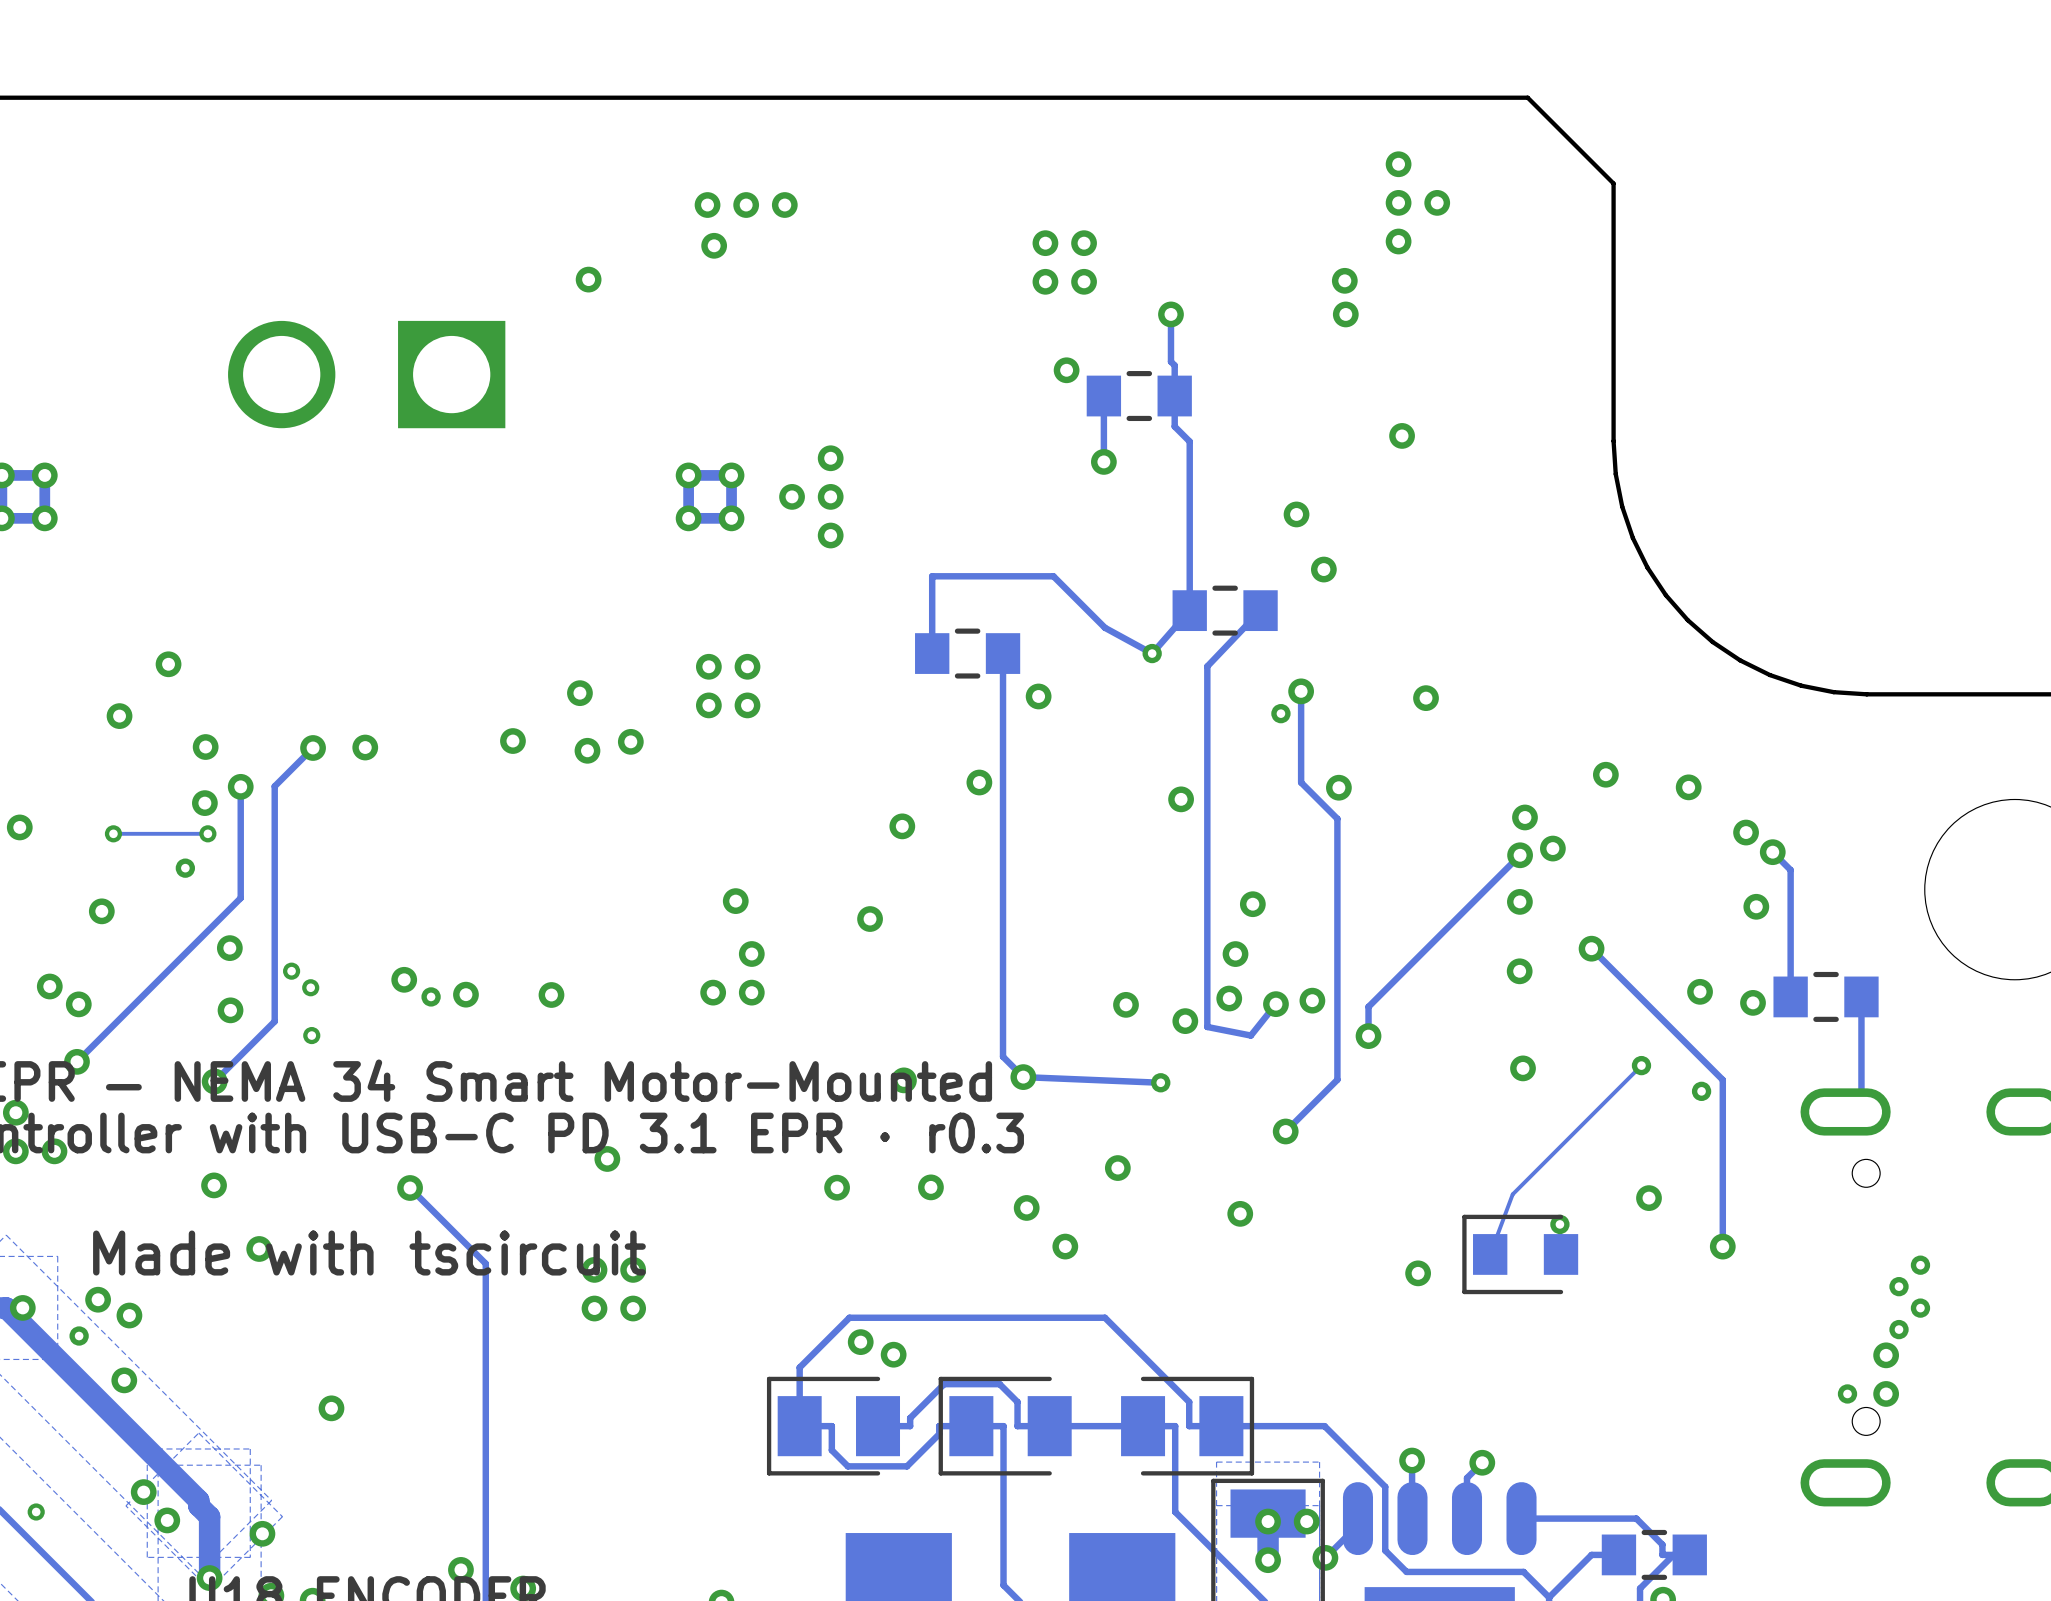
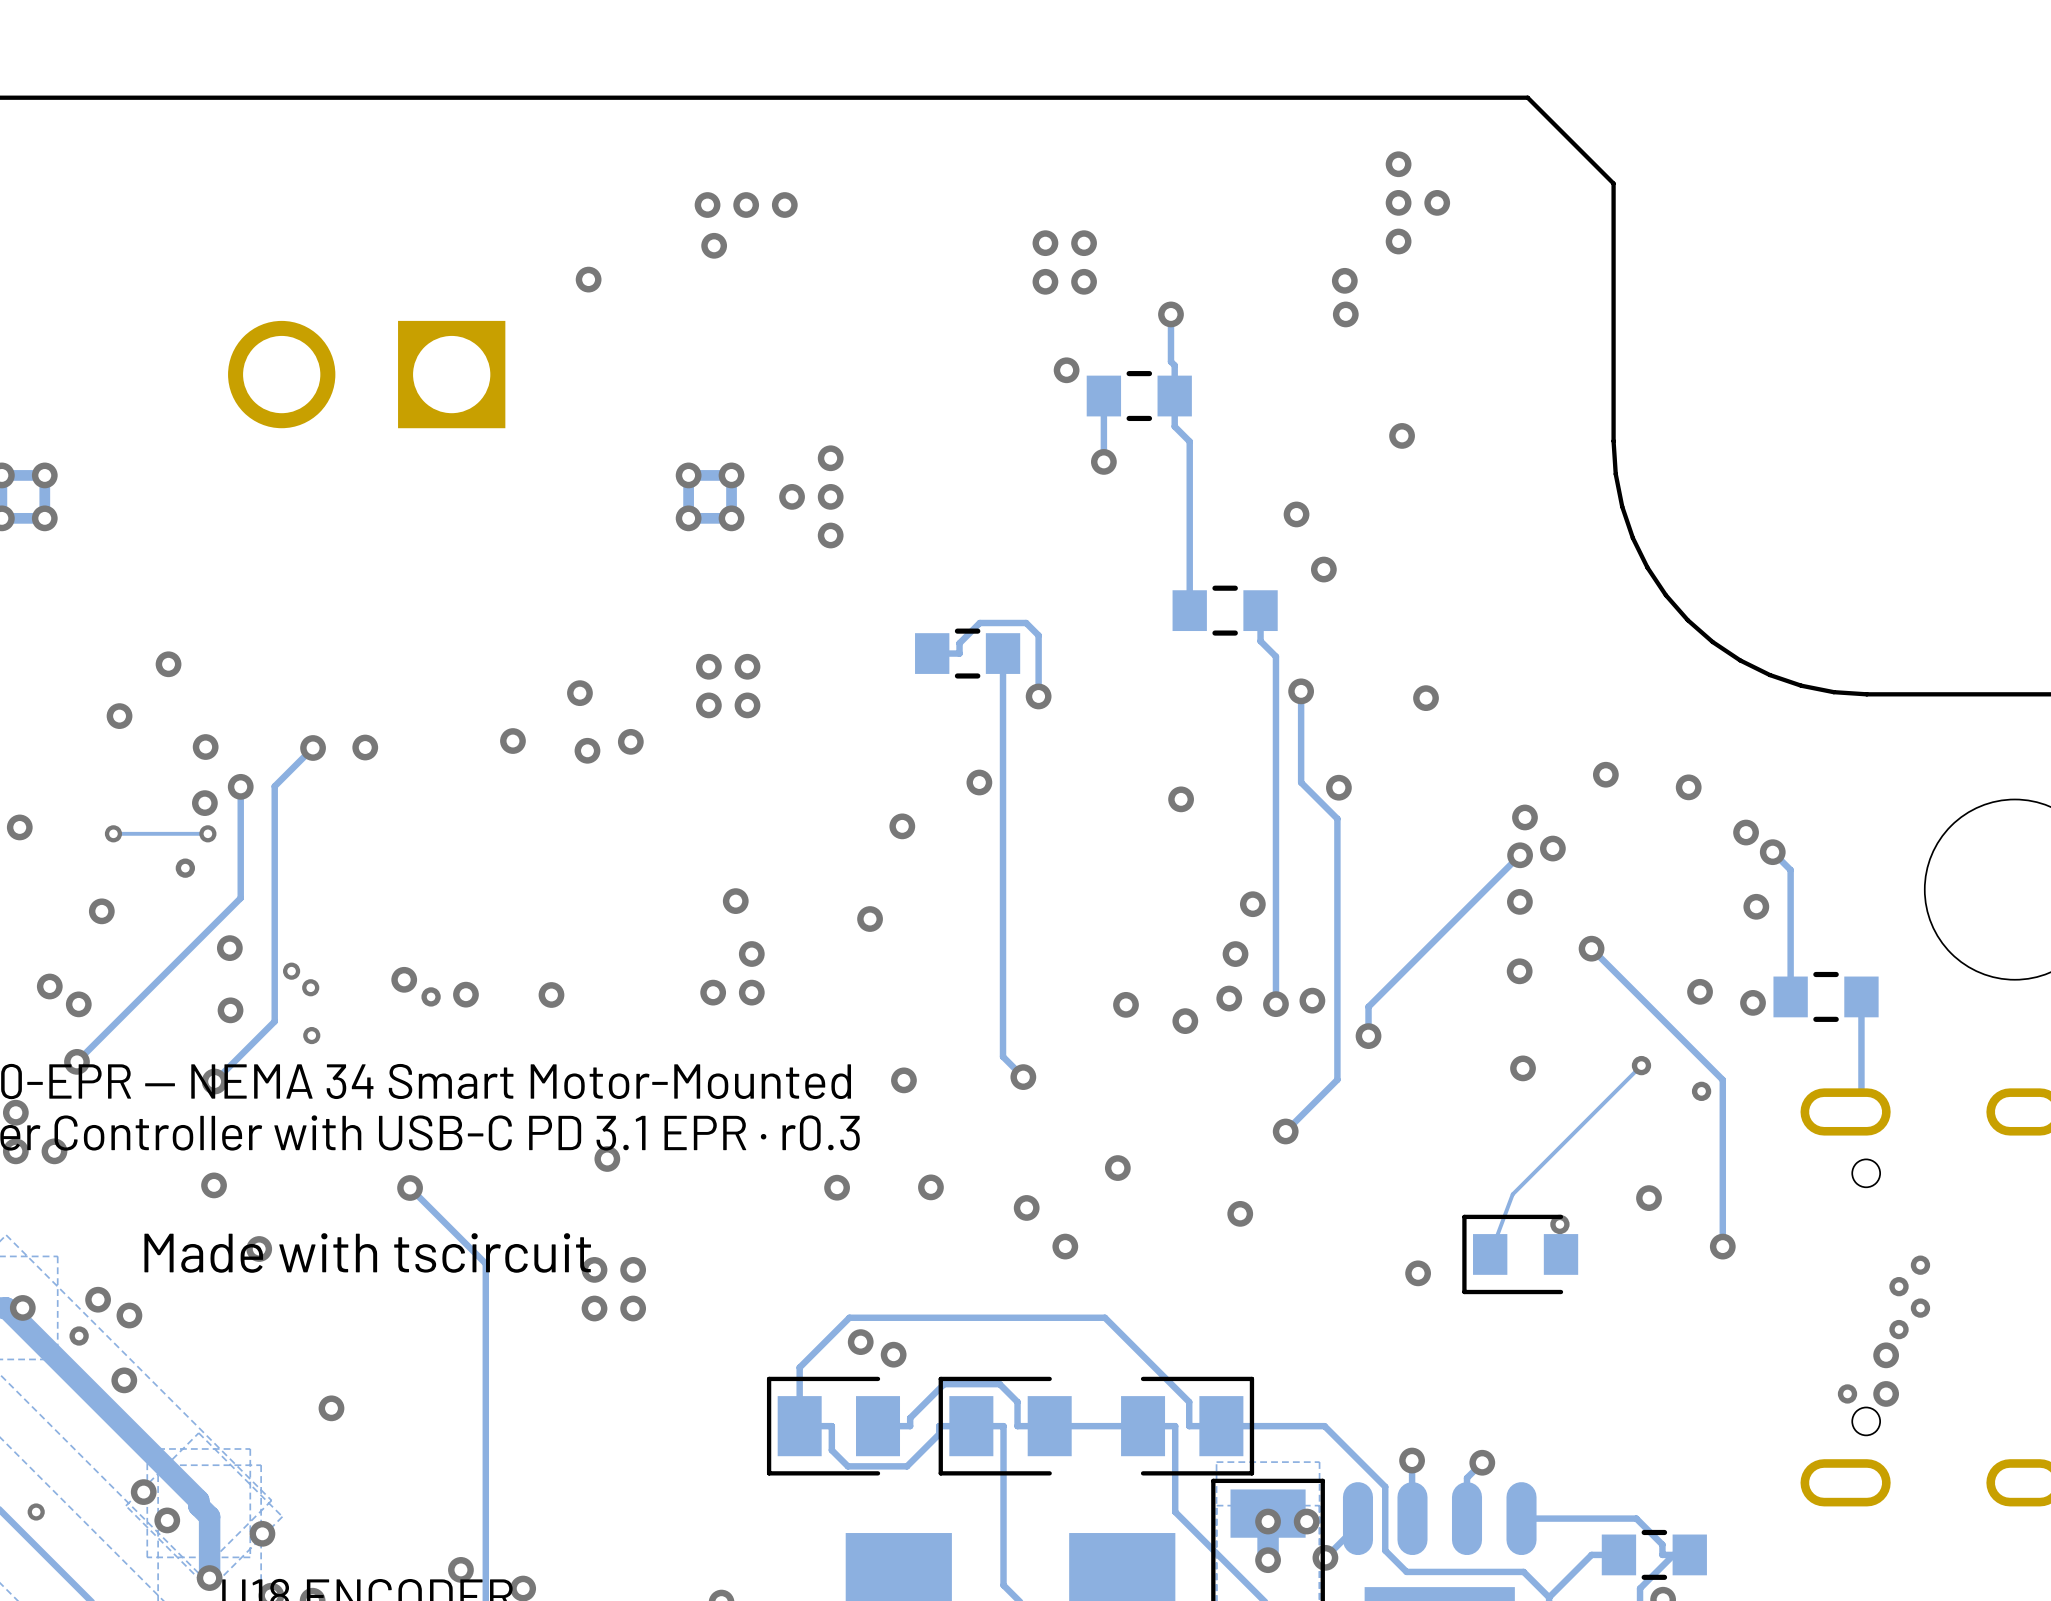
track: (1189, 610) (1152, 653) (1104, 627) (1053, 576) (932, 576) (932, 653) -> (1038, 696) (1038, 635) (1026, 623) (979, 623) (959, 643) (959, 653) (932, 653)
track: (1260, 610) (1207, 666) (1207, 1026) (1250, 1035) (1275, 1004) -> (1260, 610) (1260, 641) (1275, 656) (1275, 1004)
via: (1152, 653) -> none
via: (1280, 713) -> none
track: (1023, 1077) (1160, 1082) -> none
via: (1160, 1082) -> none

